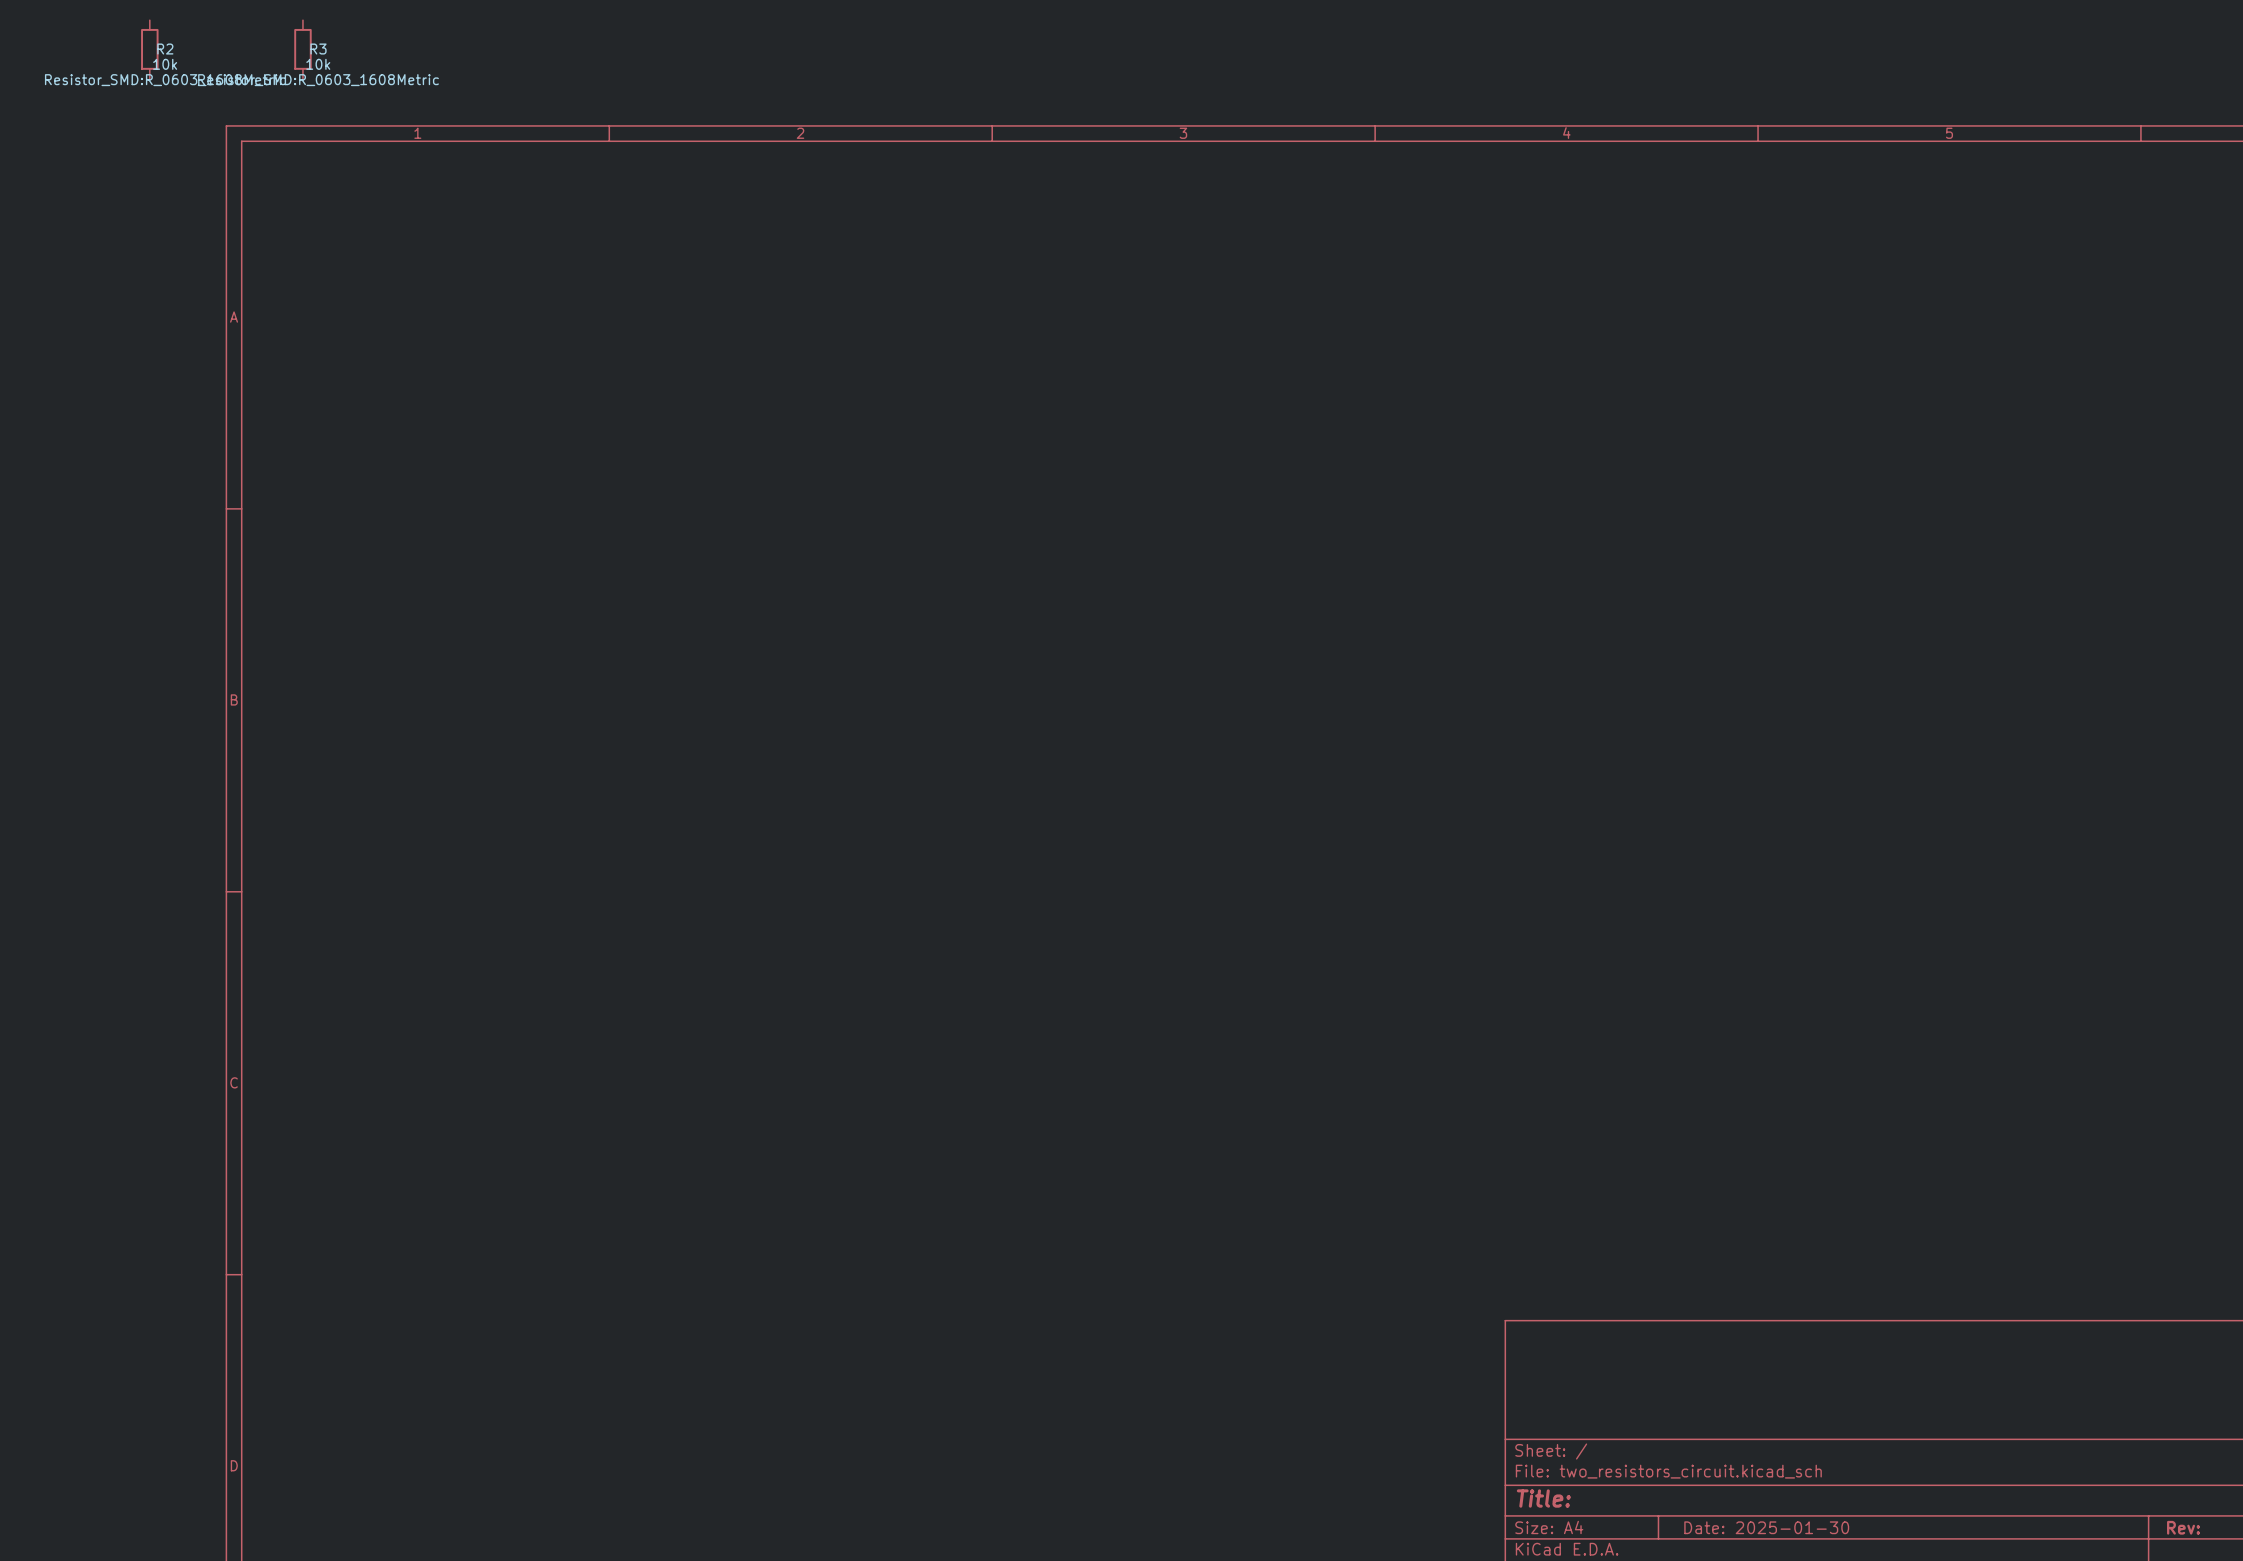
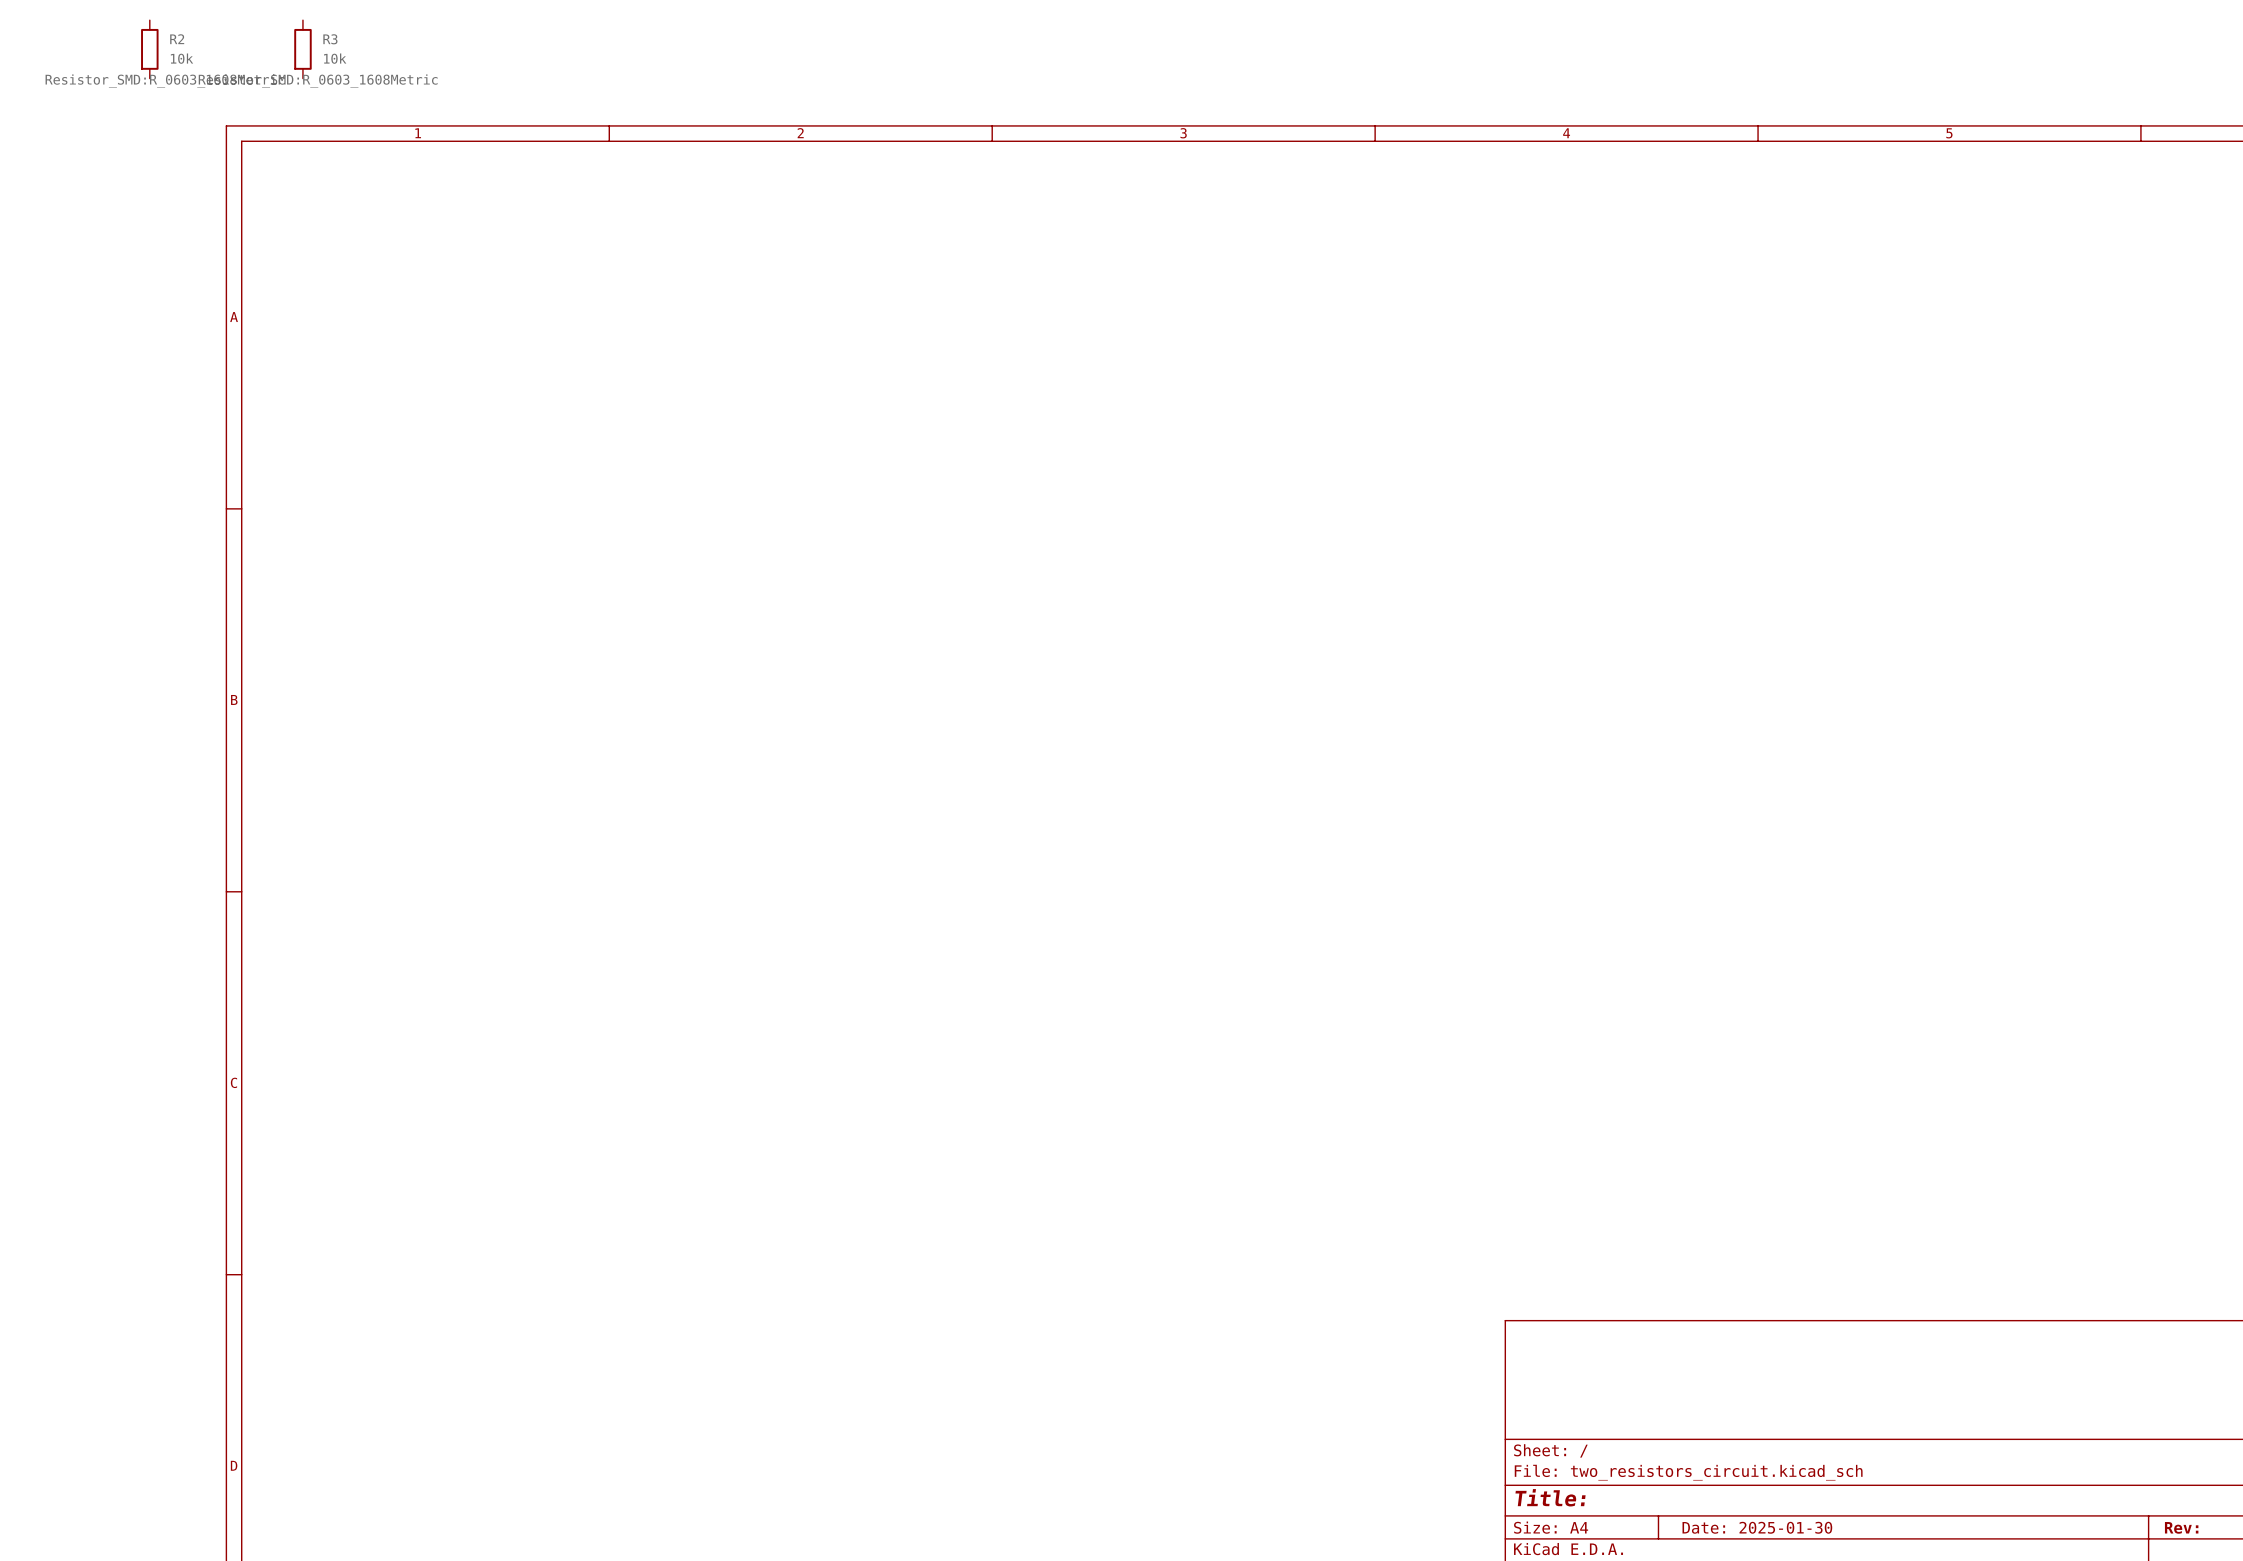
R2 name position: R2 (165, 49) -> R2 (177, 39)
R3 name position: R3 (318, 49) -> R3 (330, 39)
R2 value position: 10k (165, 64) -> 10k (182, 58)
R3 value position: 10k (318, 64) -> 10k (335, 58)

